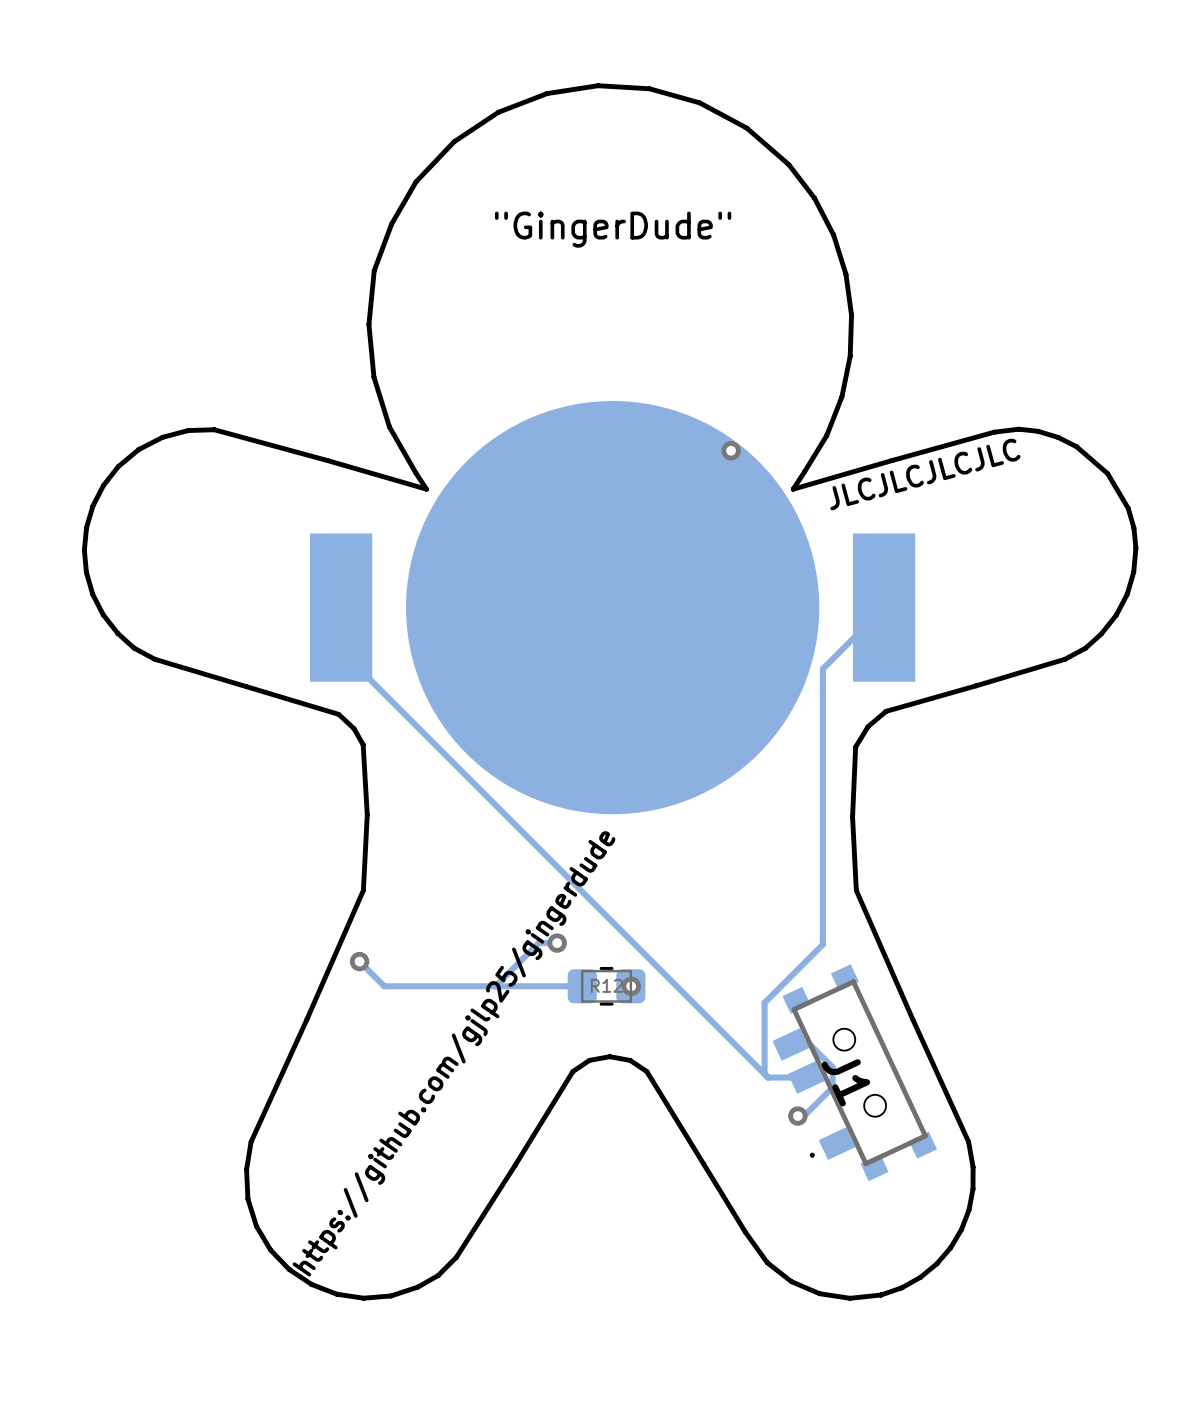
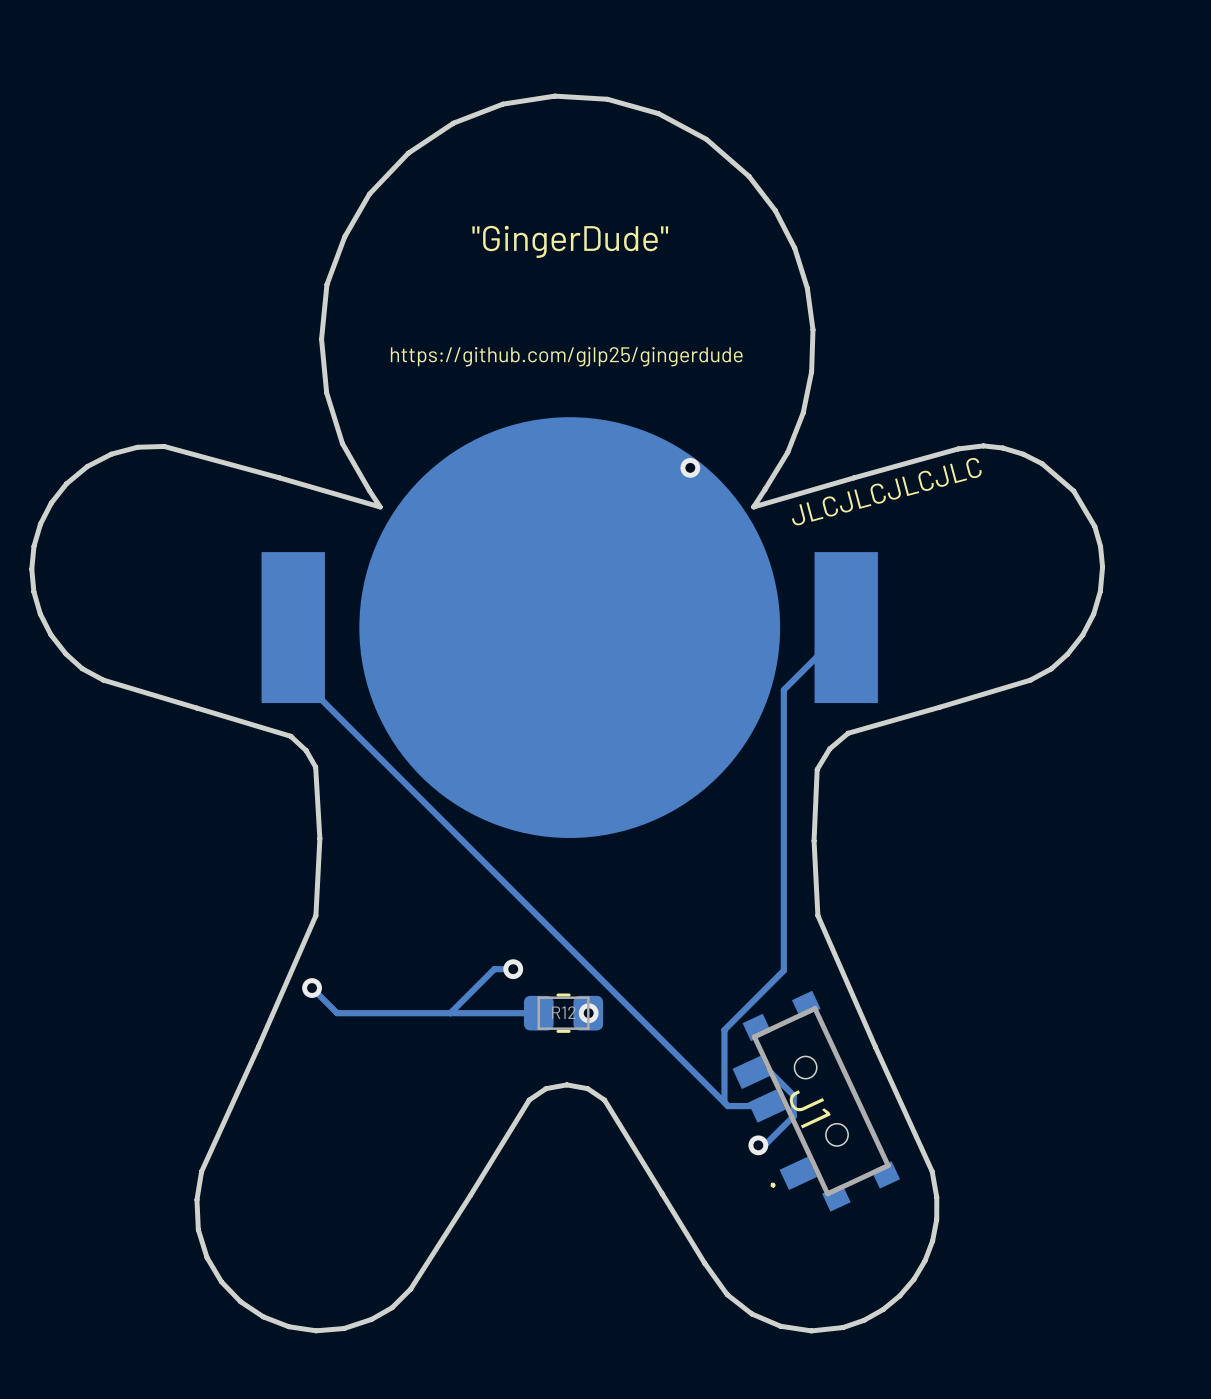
text: none -> https://github.com/gjlp25/gingerdude (566, 356)
text: https://github.com/gjlp25/gingerdude (453, 1053) -> none

